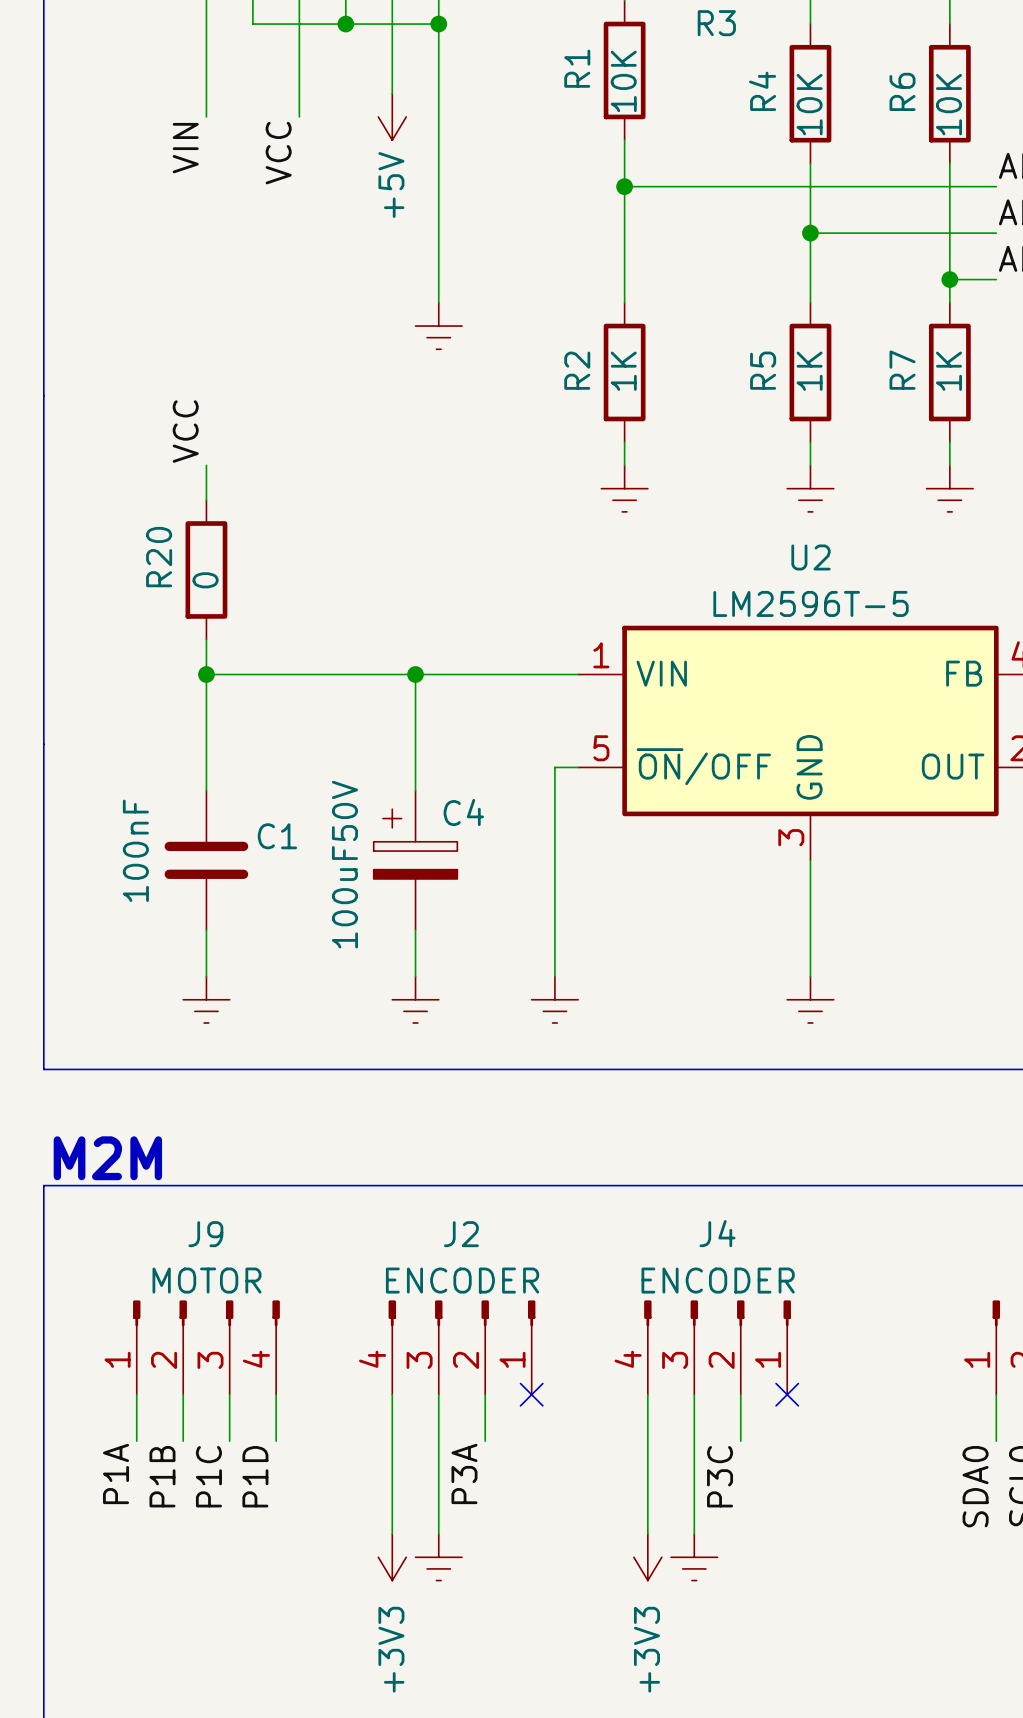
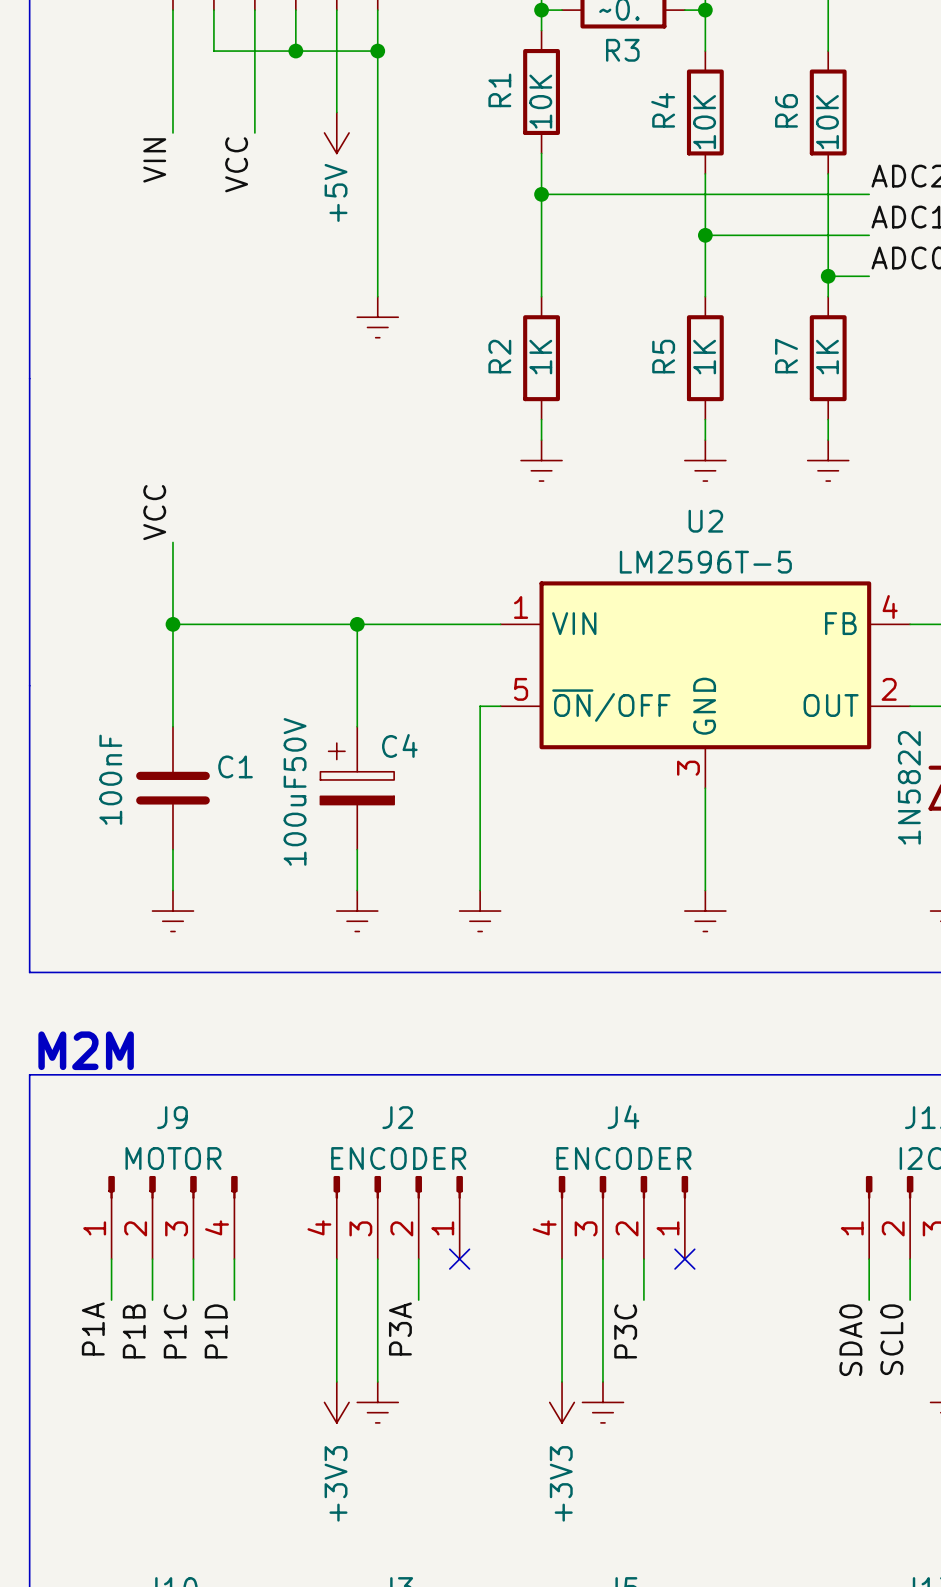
label position: VCC (185, 431) -> VCC (154, 512)
wire: (206, 465) (206, 500) -> none
R20: 0 (206, 569) -> none
wire: none -> (172, 542) (172, 593)

